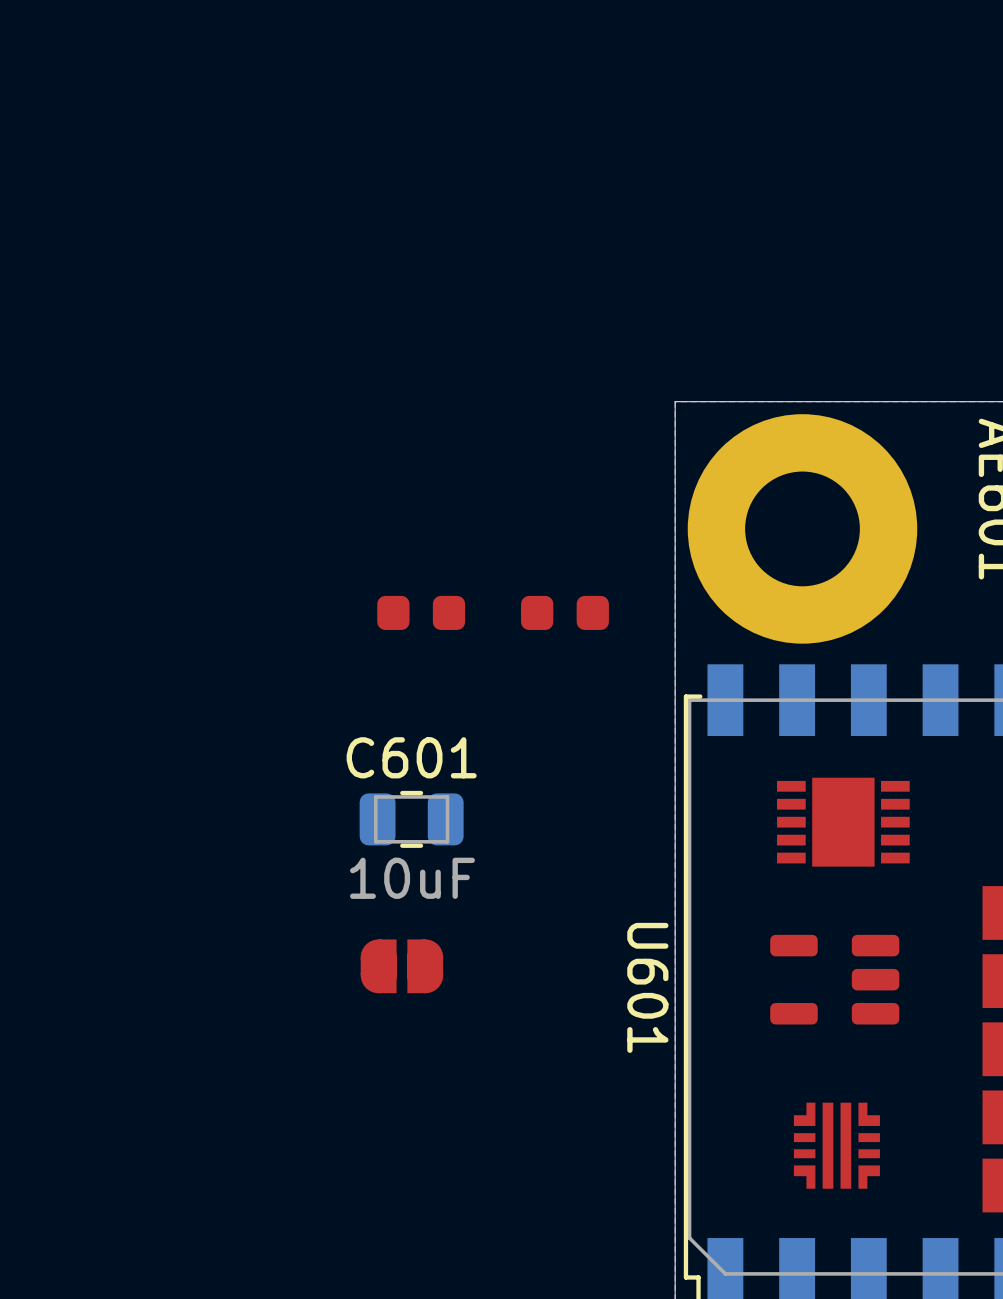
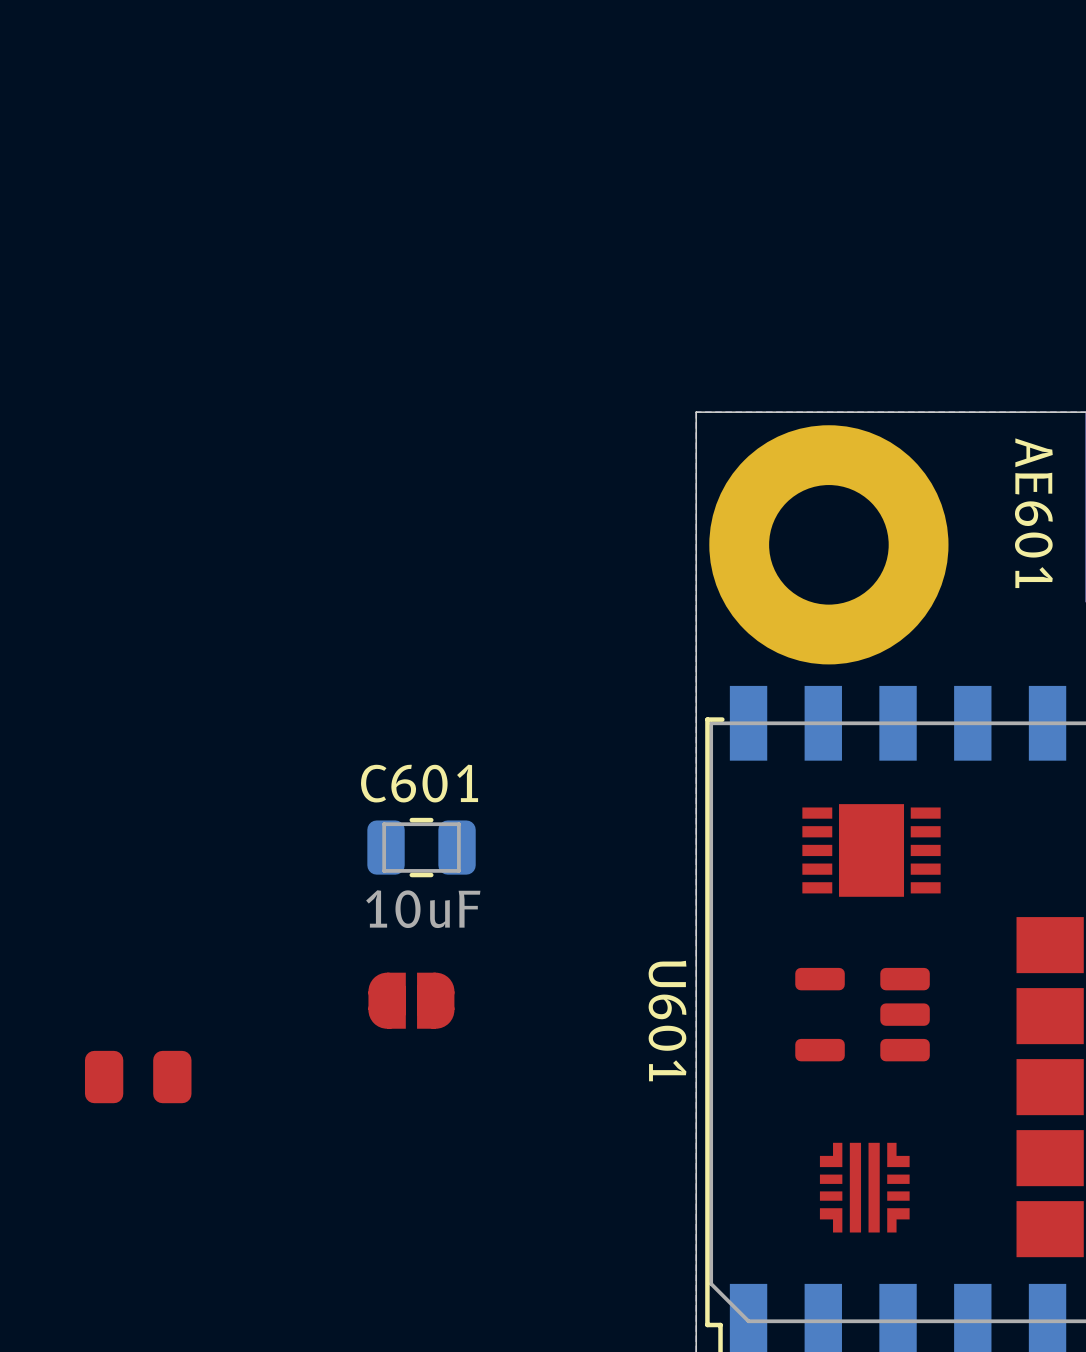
part: (421, 612) -> none
part: (564, 612) -> none
part: none -> (138, 1077)

